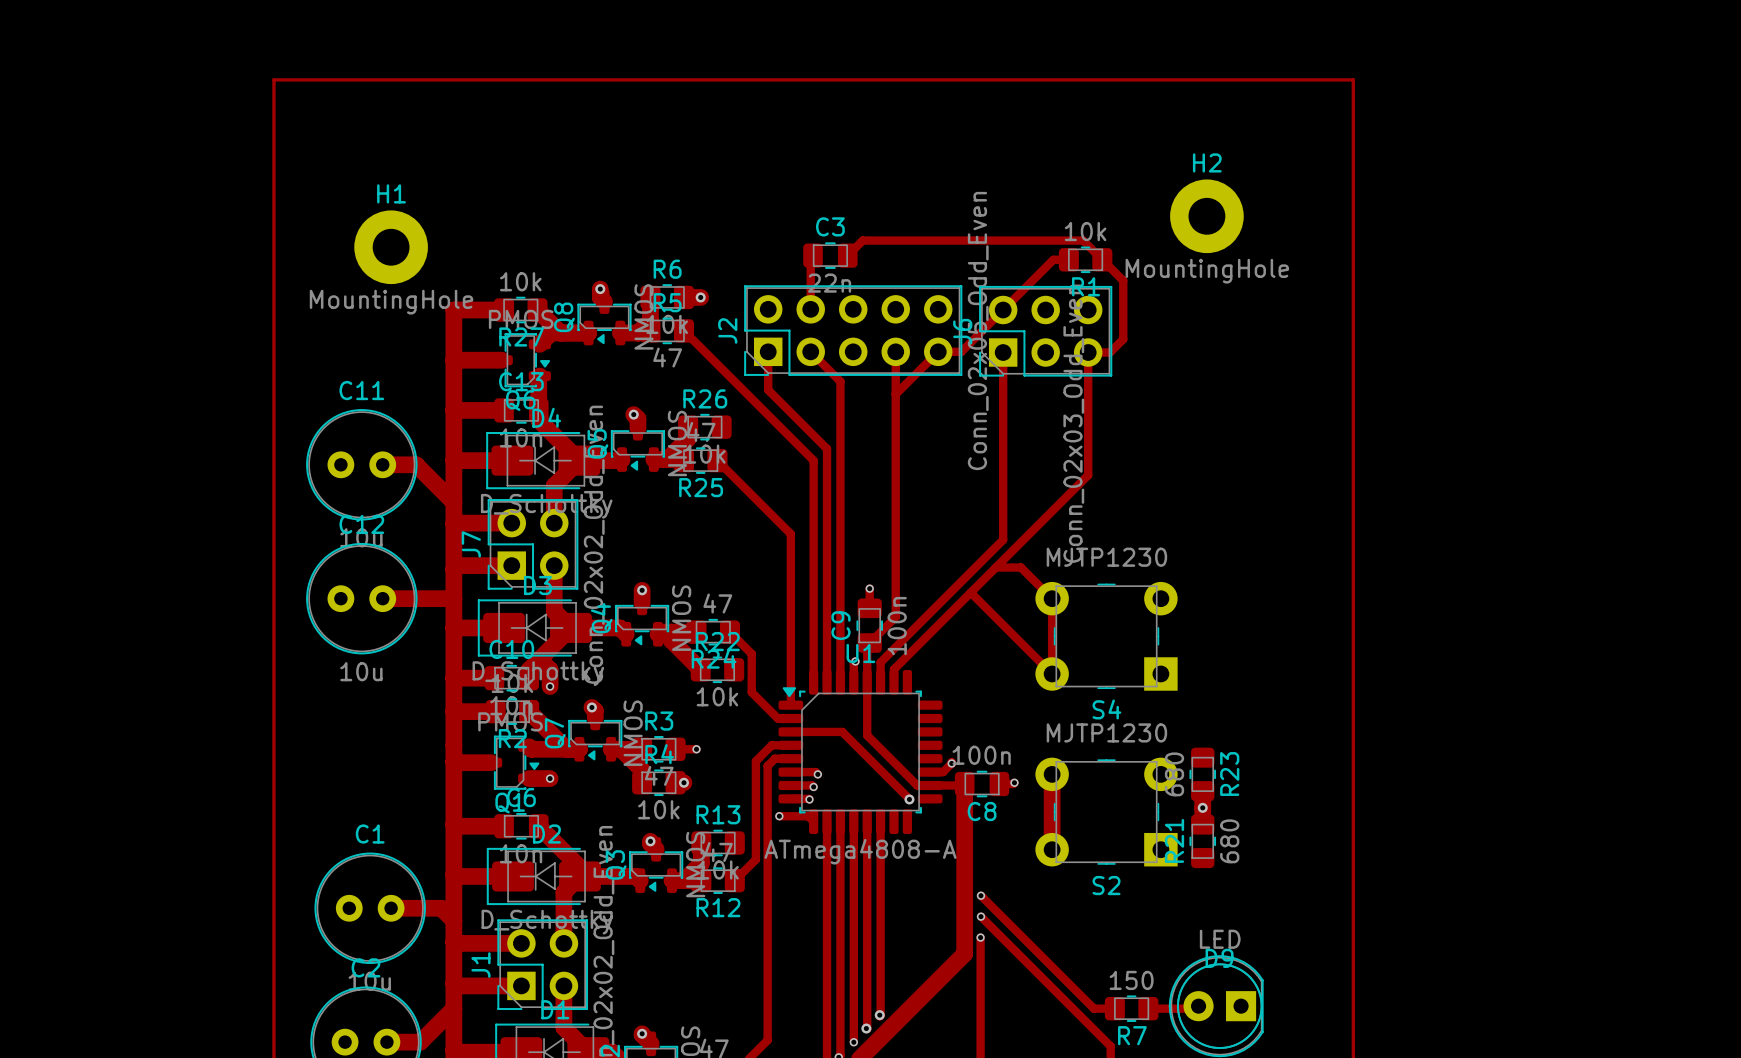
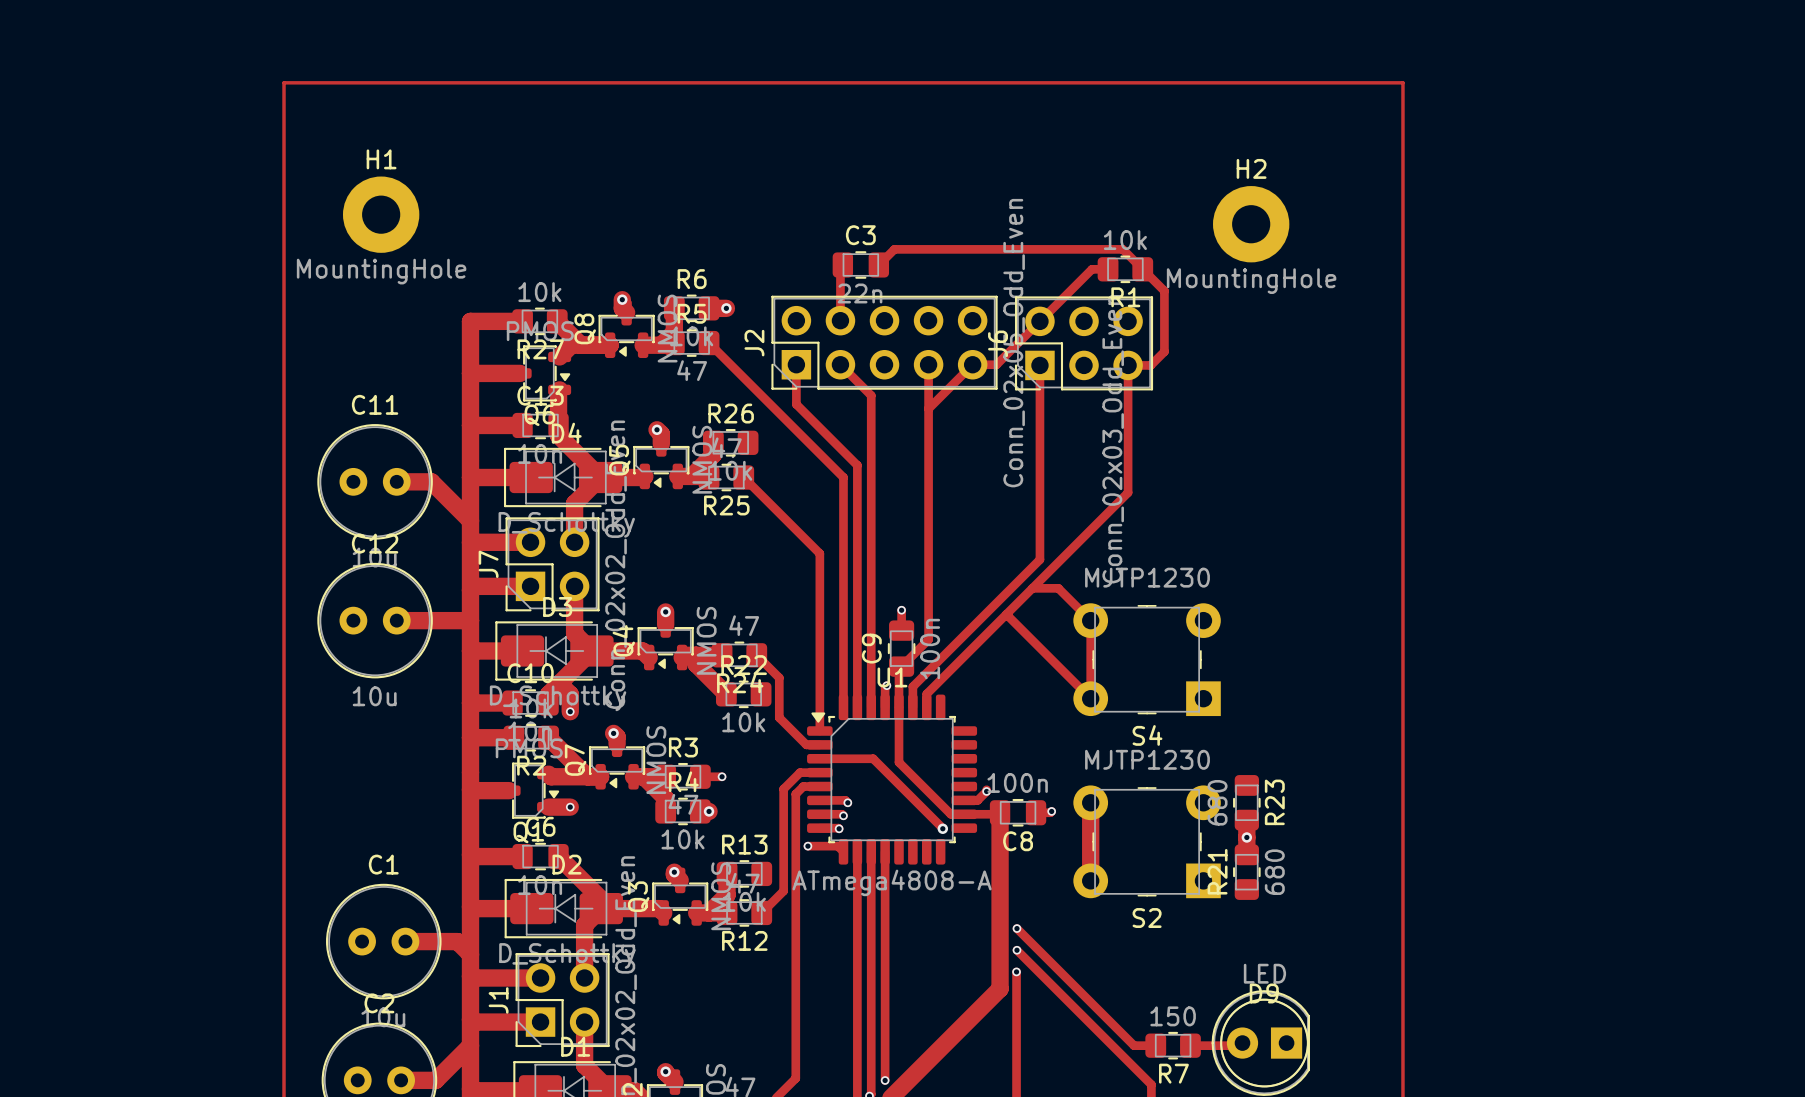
H1 position: (391, 247) -> (381, 214)
track: (867, 821) (866, 1028) -> none
track: (880, 821) (879, 1015) -> none
via: (879, 1015) -> none
via: (866, 1028) -> none

